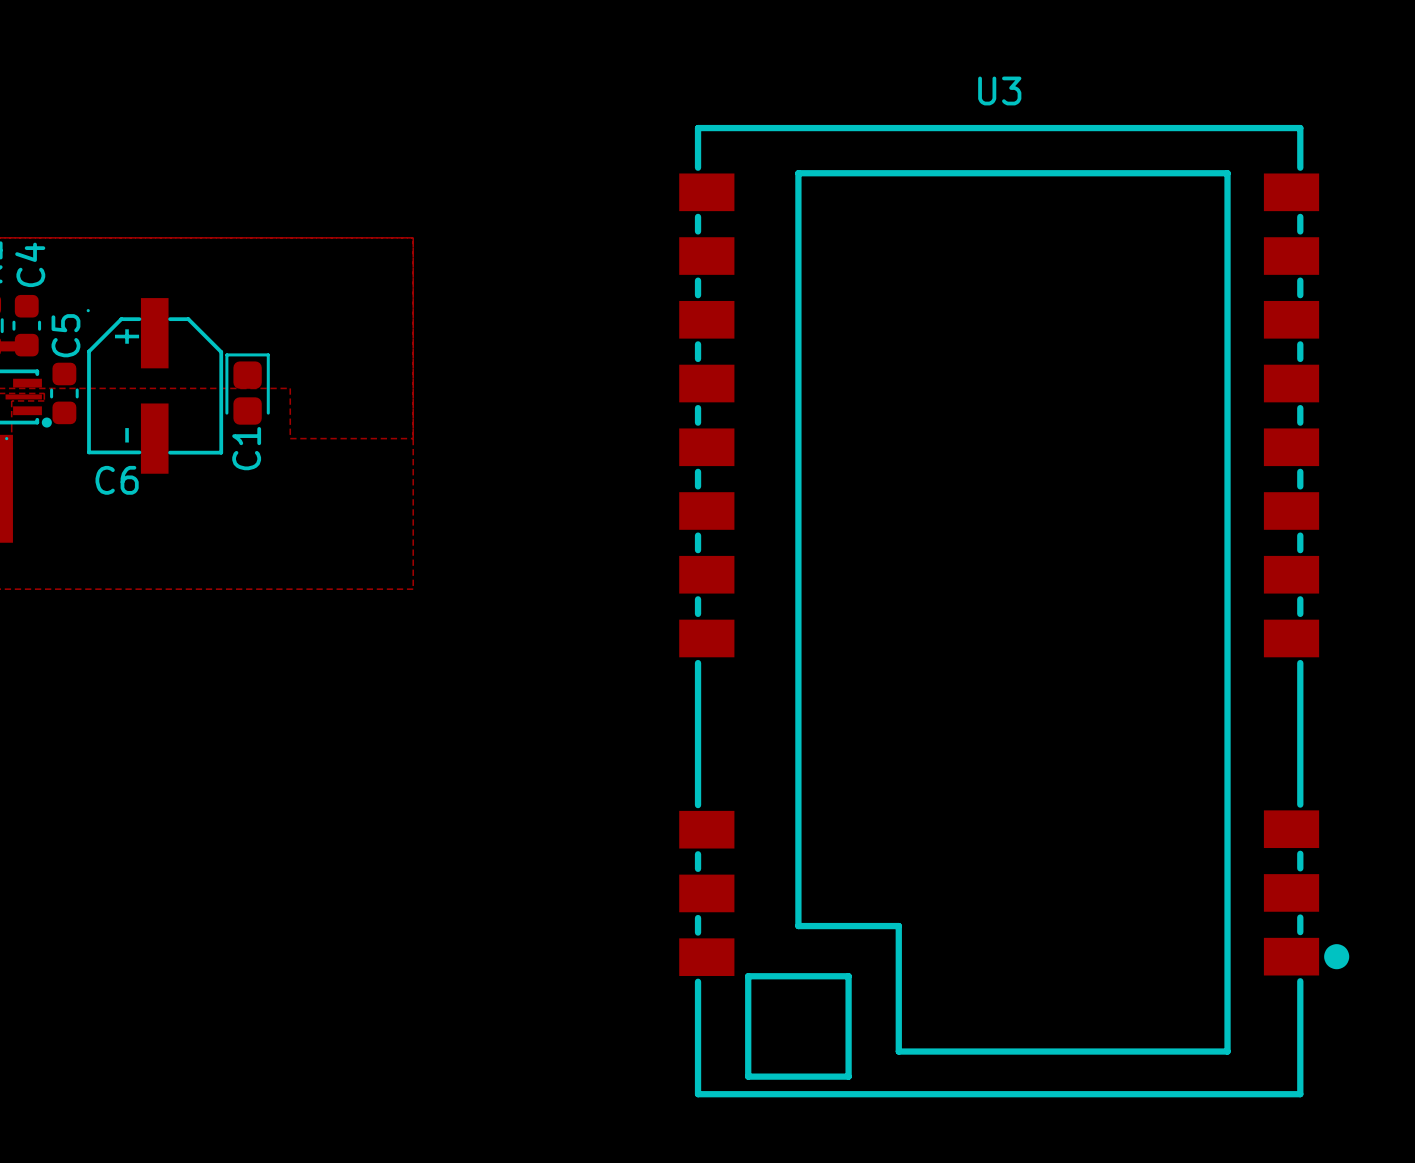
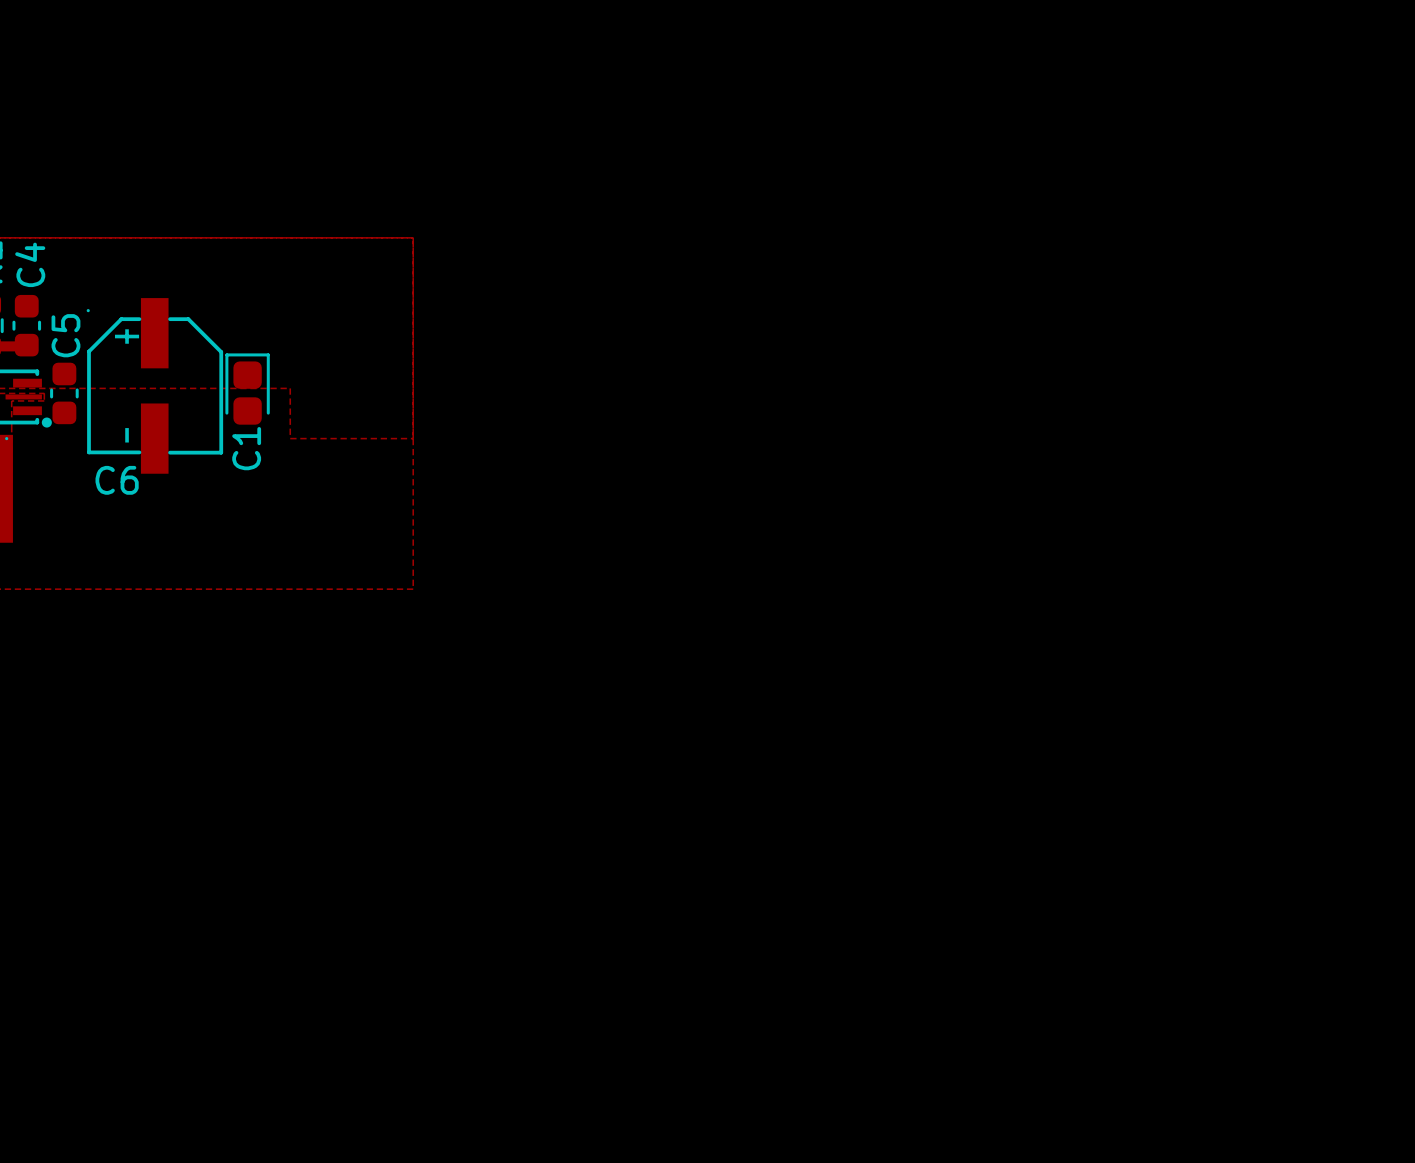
U3: (1014, 611) -> none

